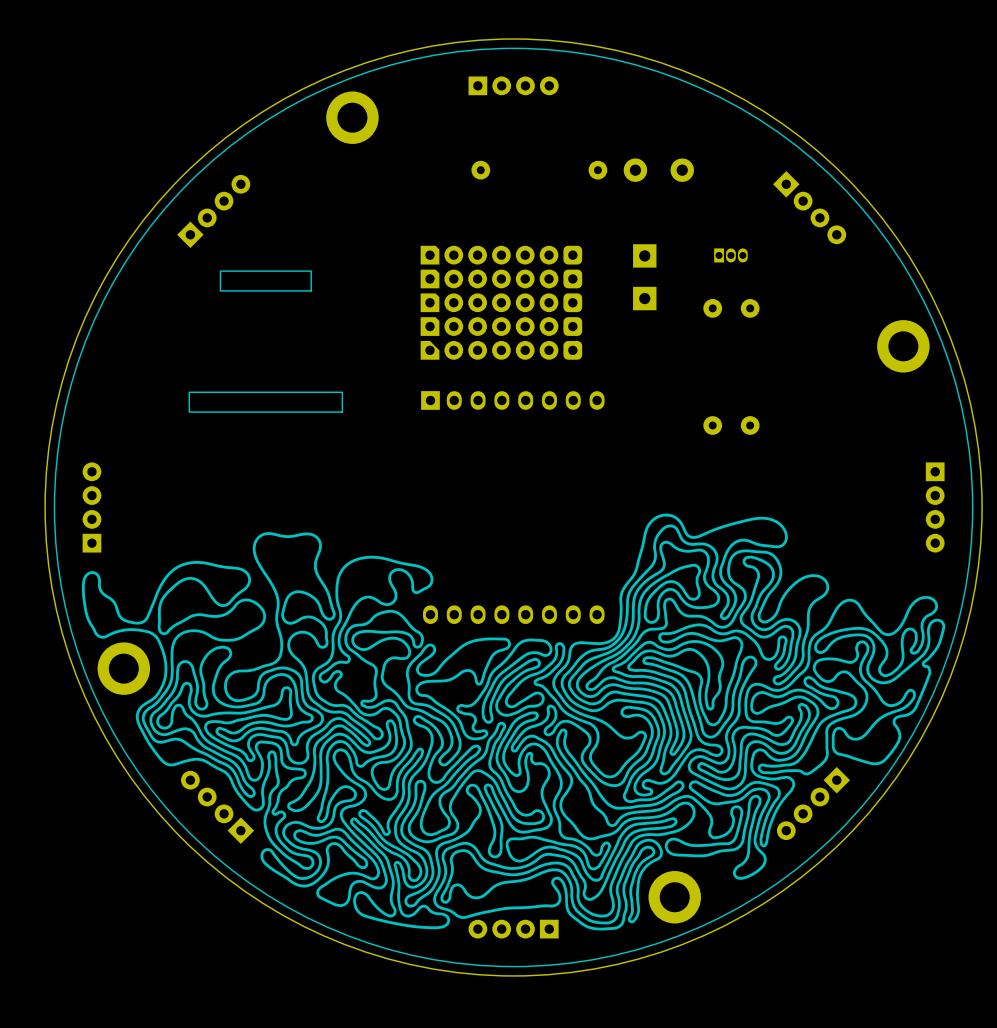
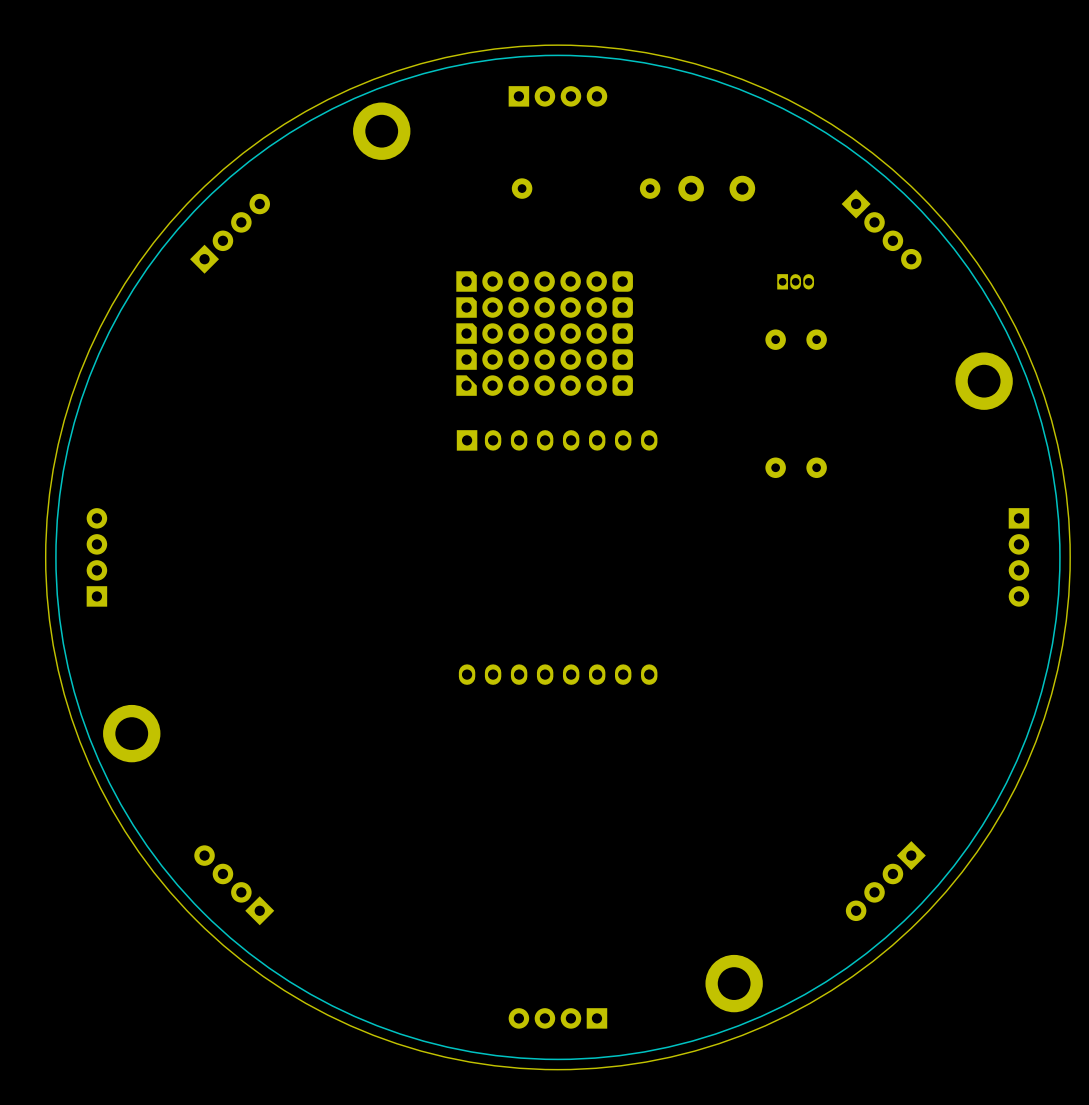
part: (644, 255) -> none
drawing: [188, 270, 343, 413] -> none
part: (644, 298) -> none
drawing: [81, 513, 946, 931] -> none

